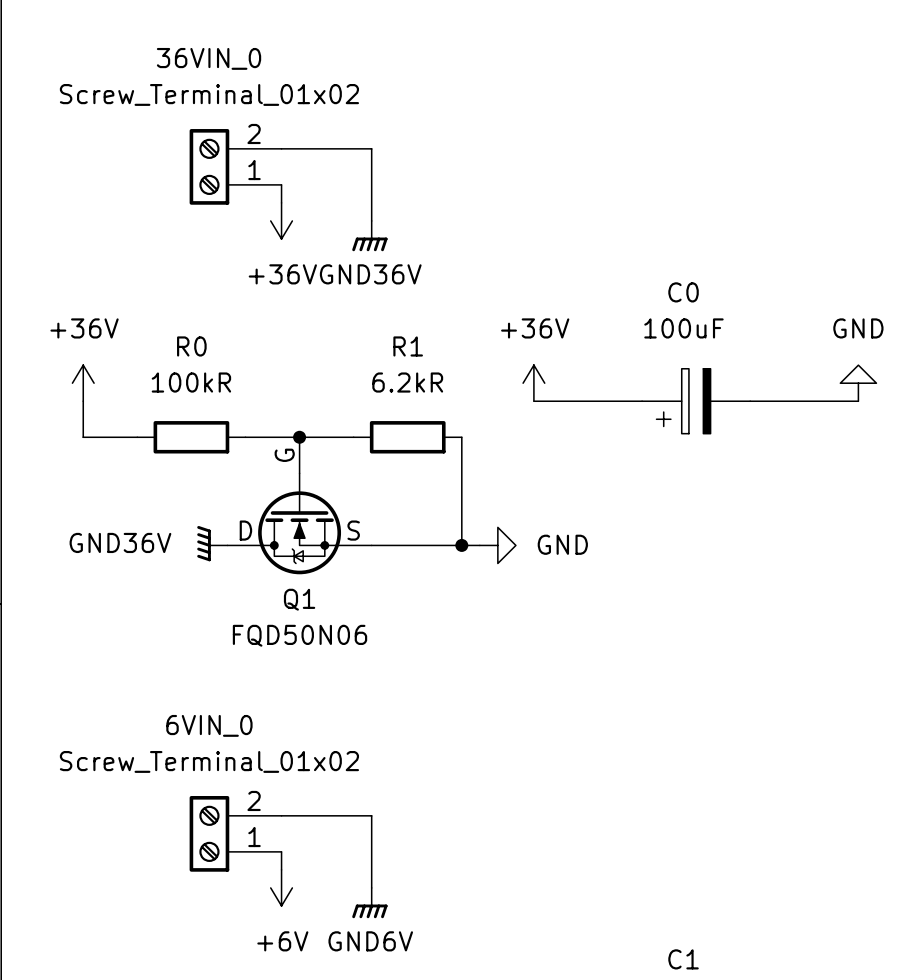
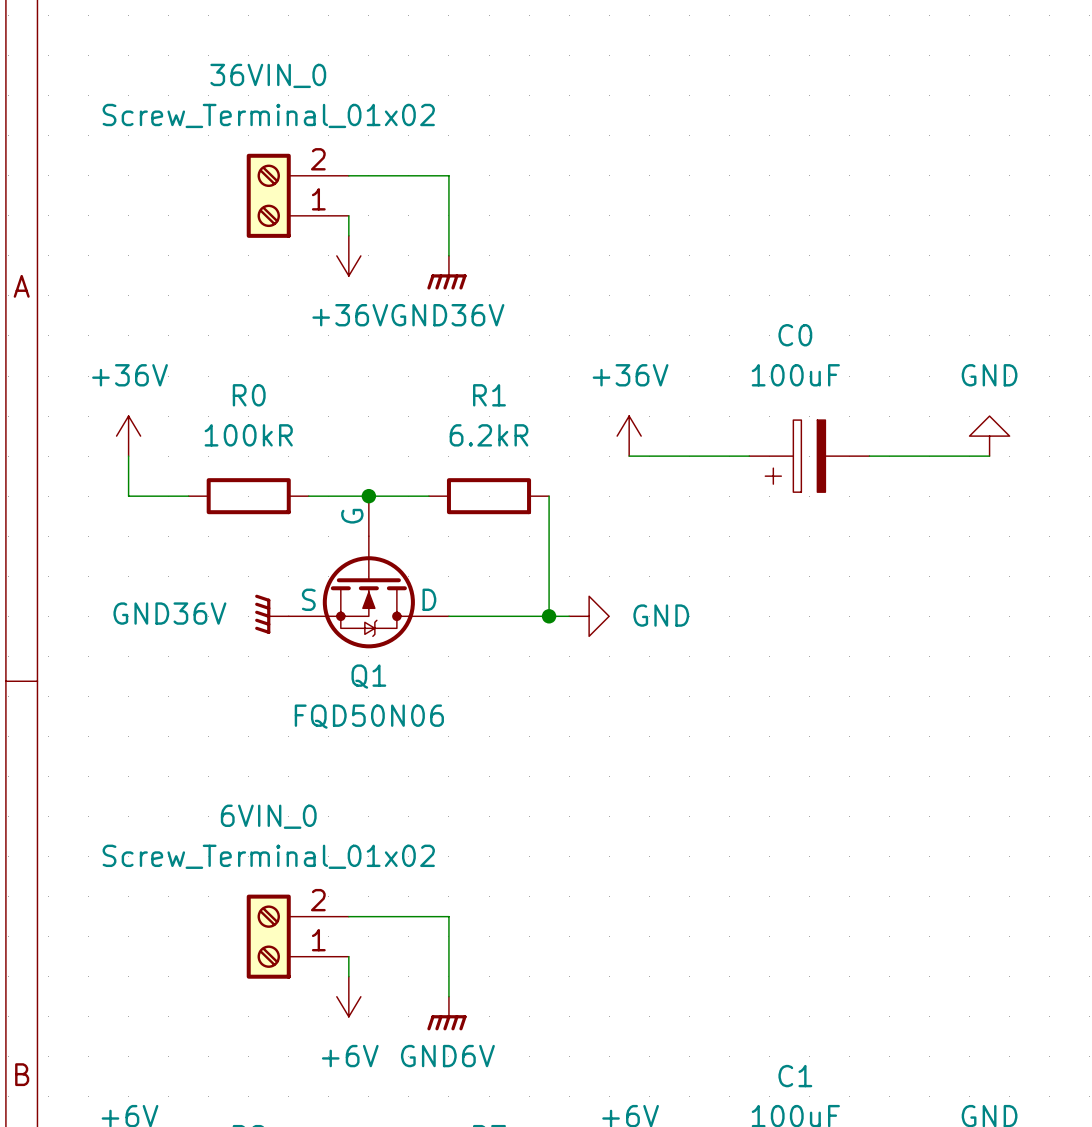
Q1 flip: as is (299, 523) -> left-right (368, 592)

